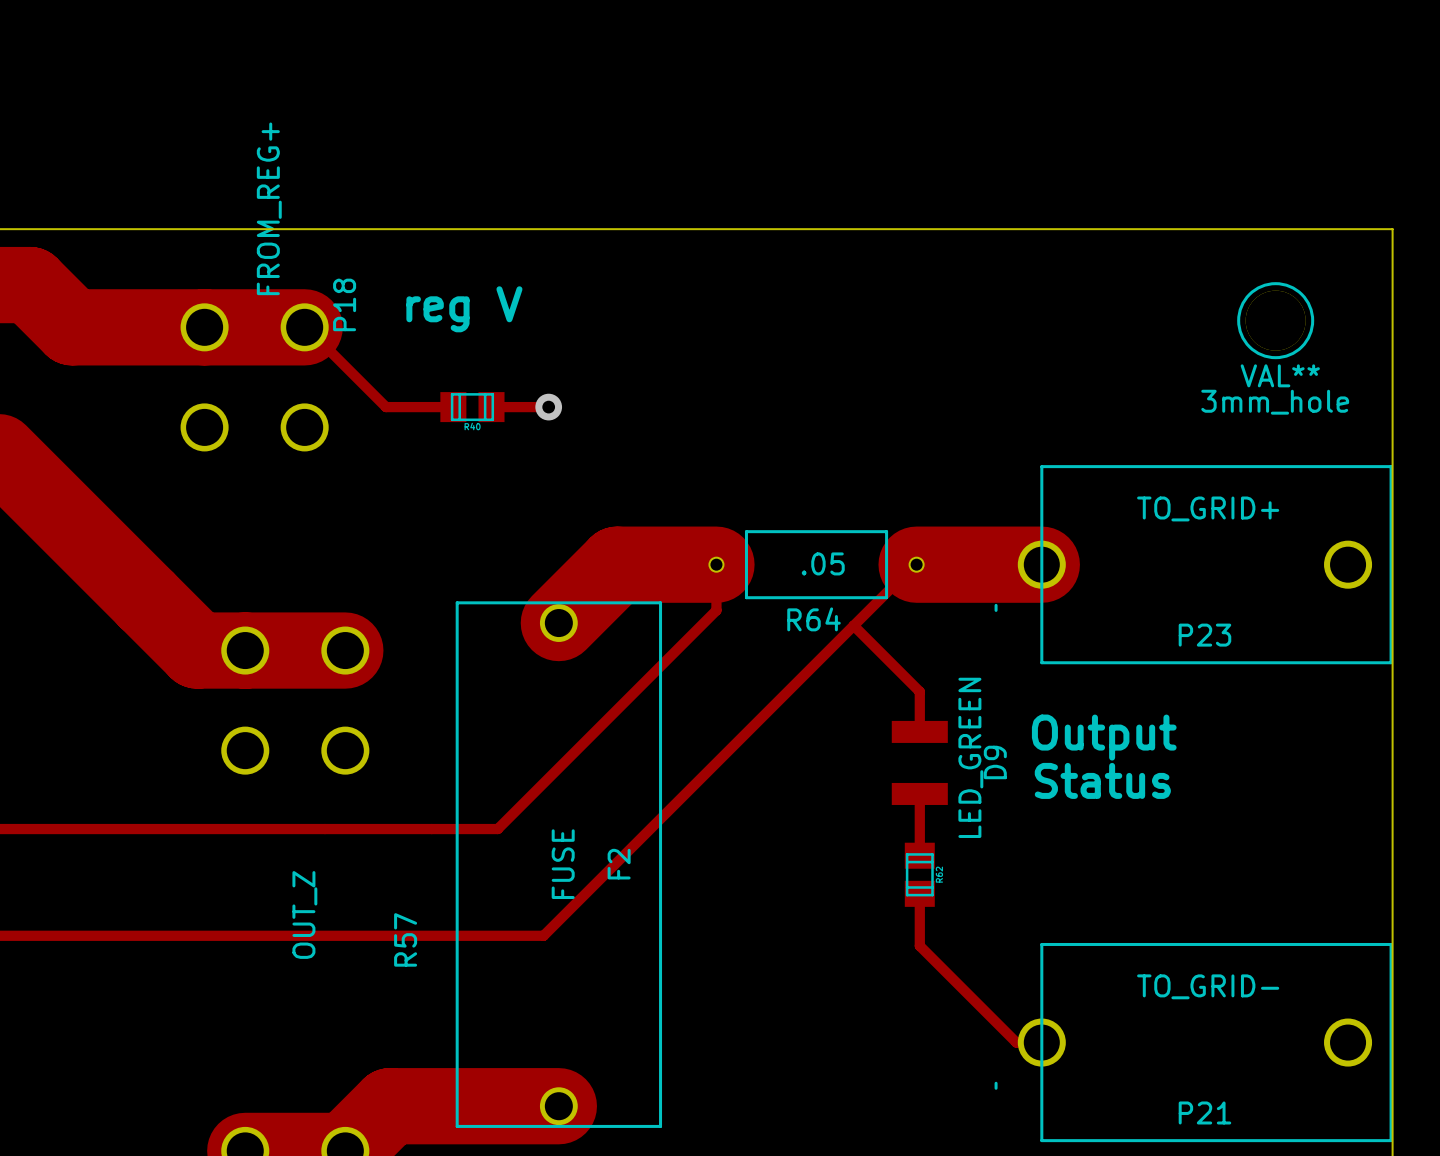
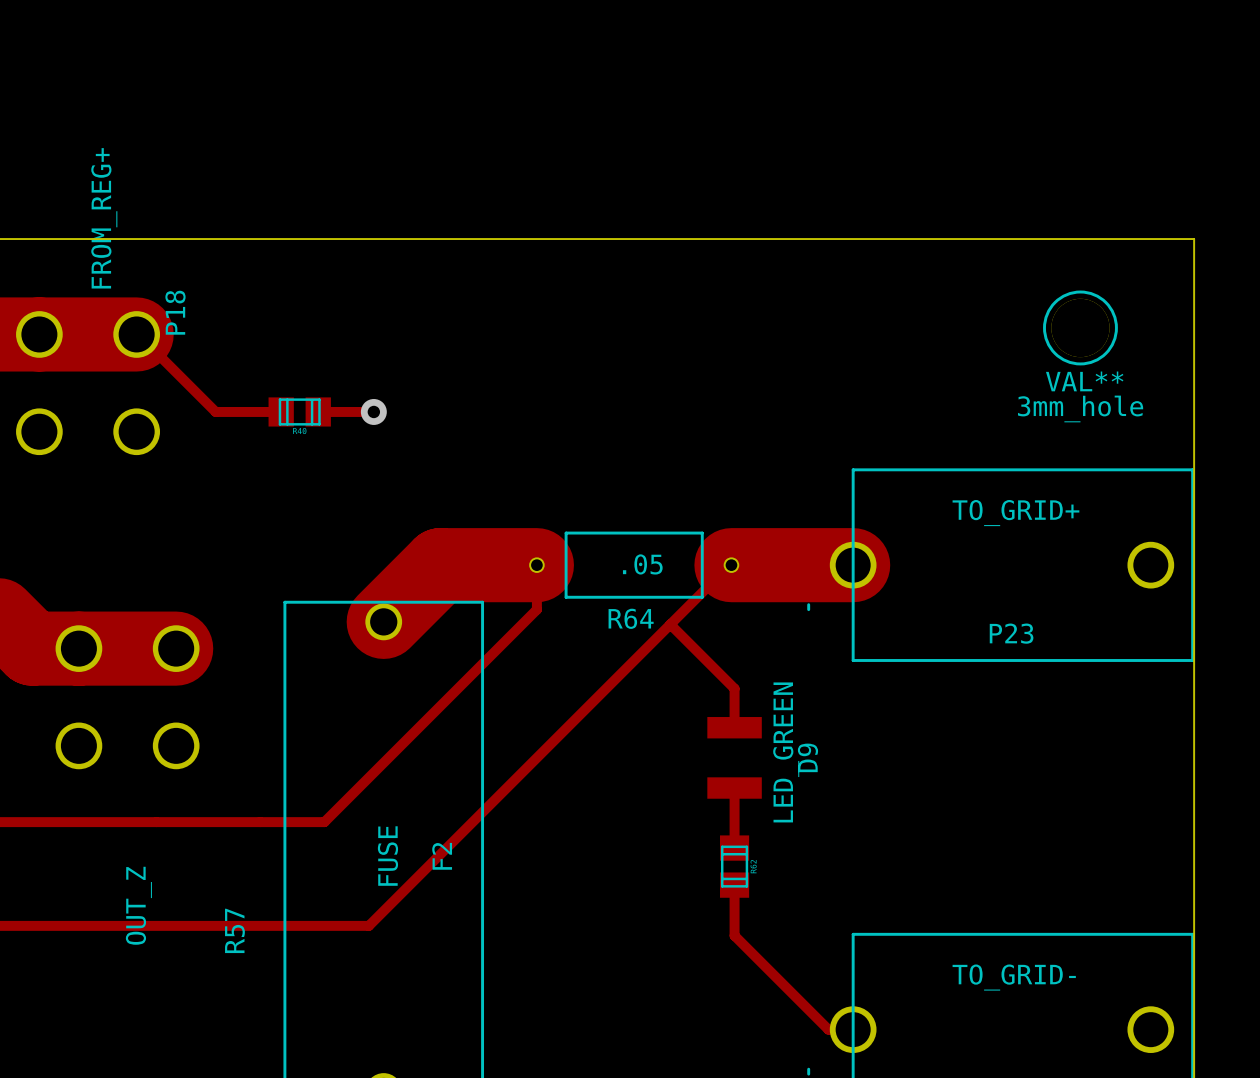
text: reg V (464, 309) -> none
text: Output (1104, 737) -> none
text: Status (1102, 780) -> none

